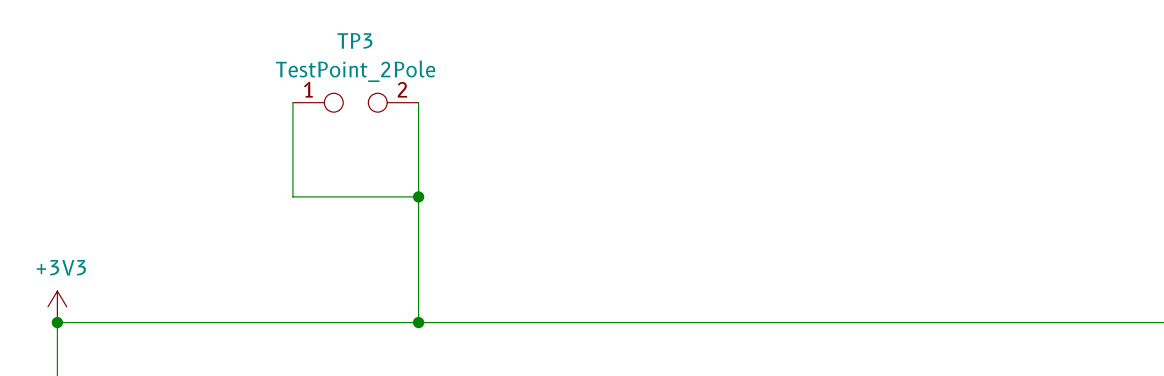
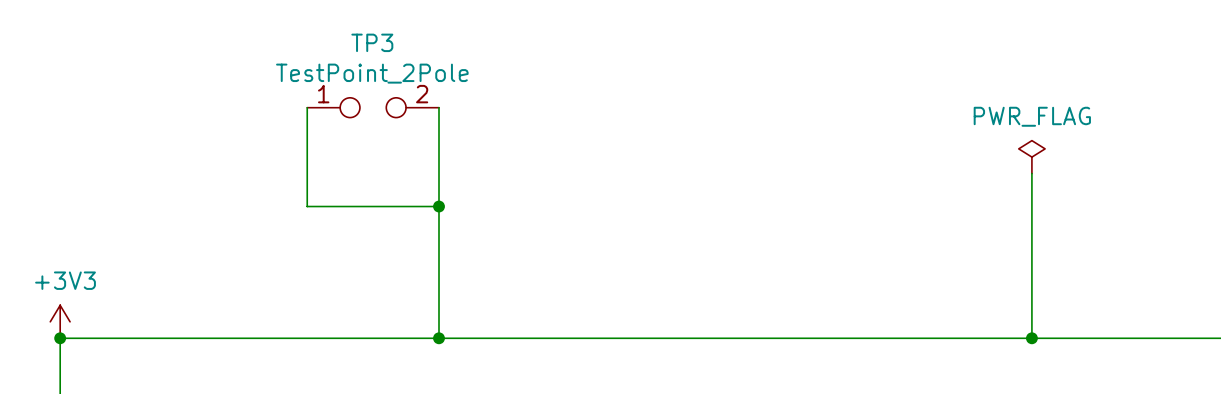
power symbol: none -> PWR_FLAG (1031, 157)
wire: none -> (1031, 173) (1031, 338)
junction: none -> (1031, 338)

